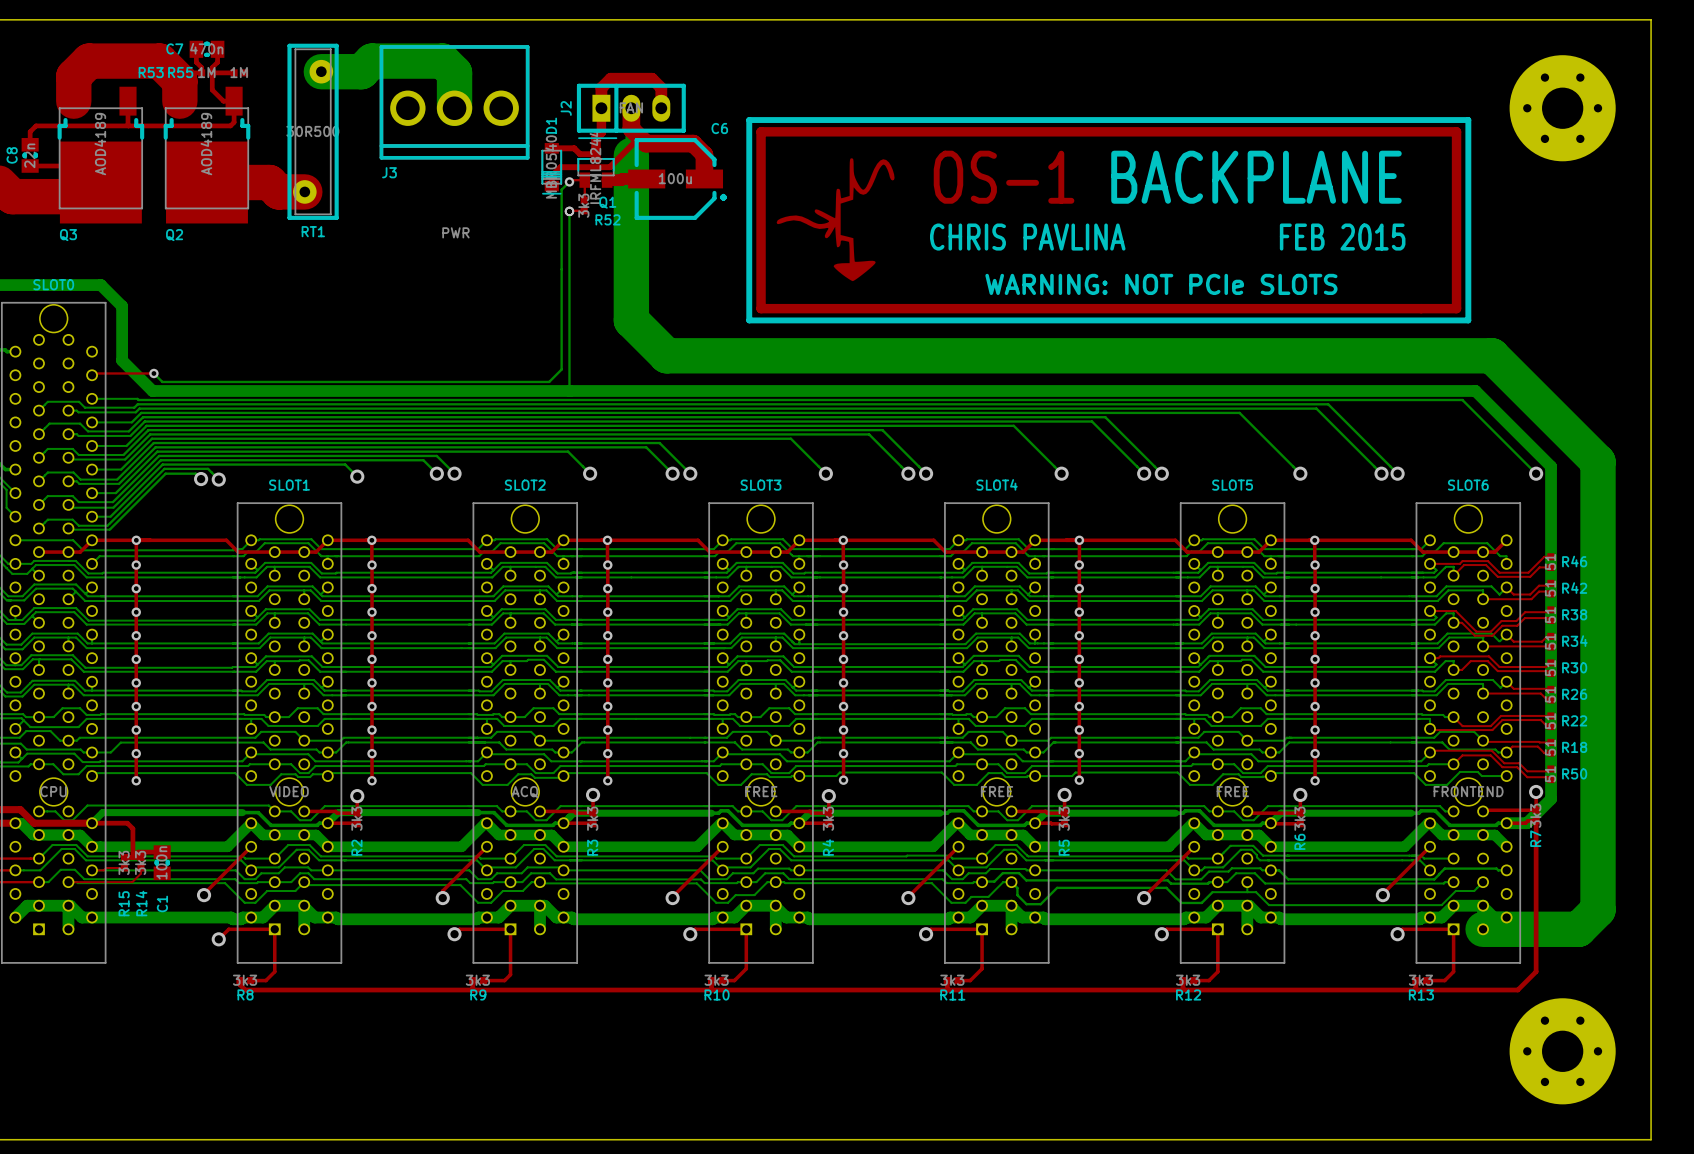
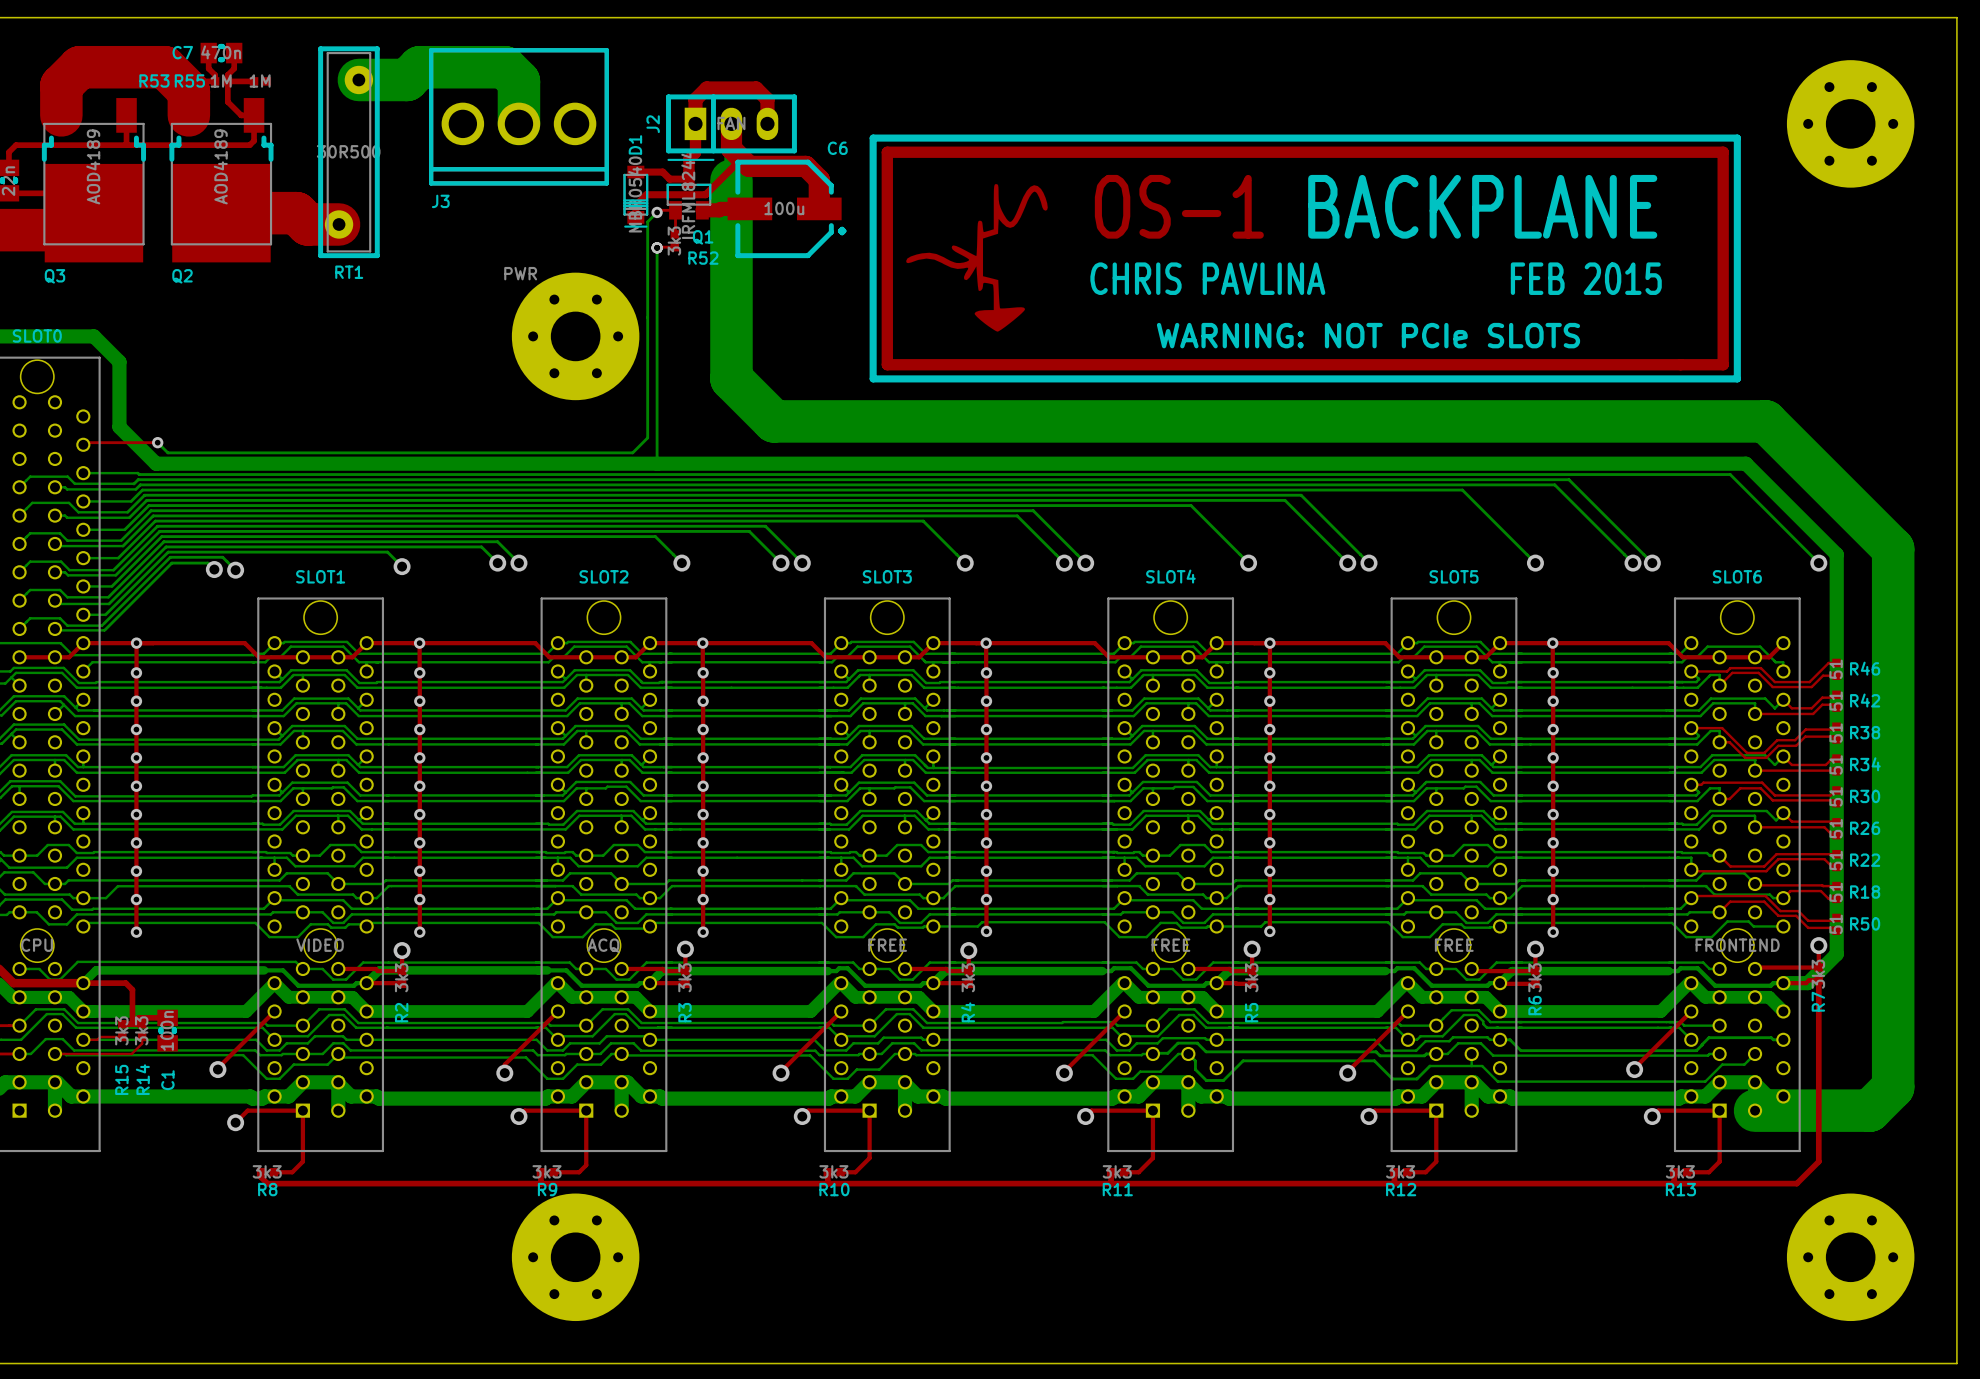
part: none -> (575, 336)
part: none -> (575, 1257)

